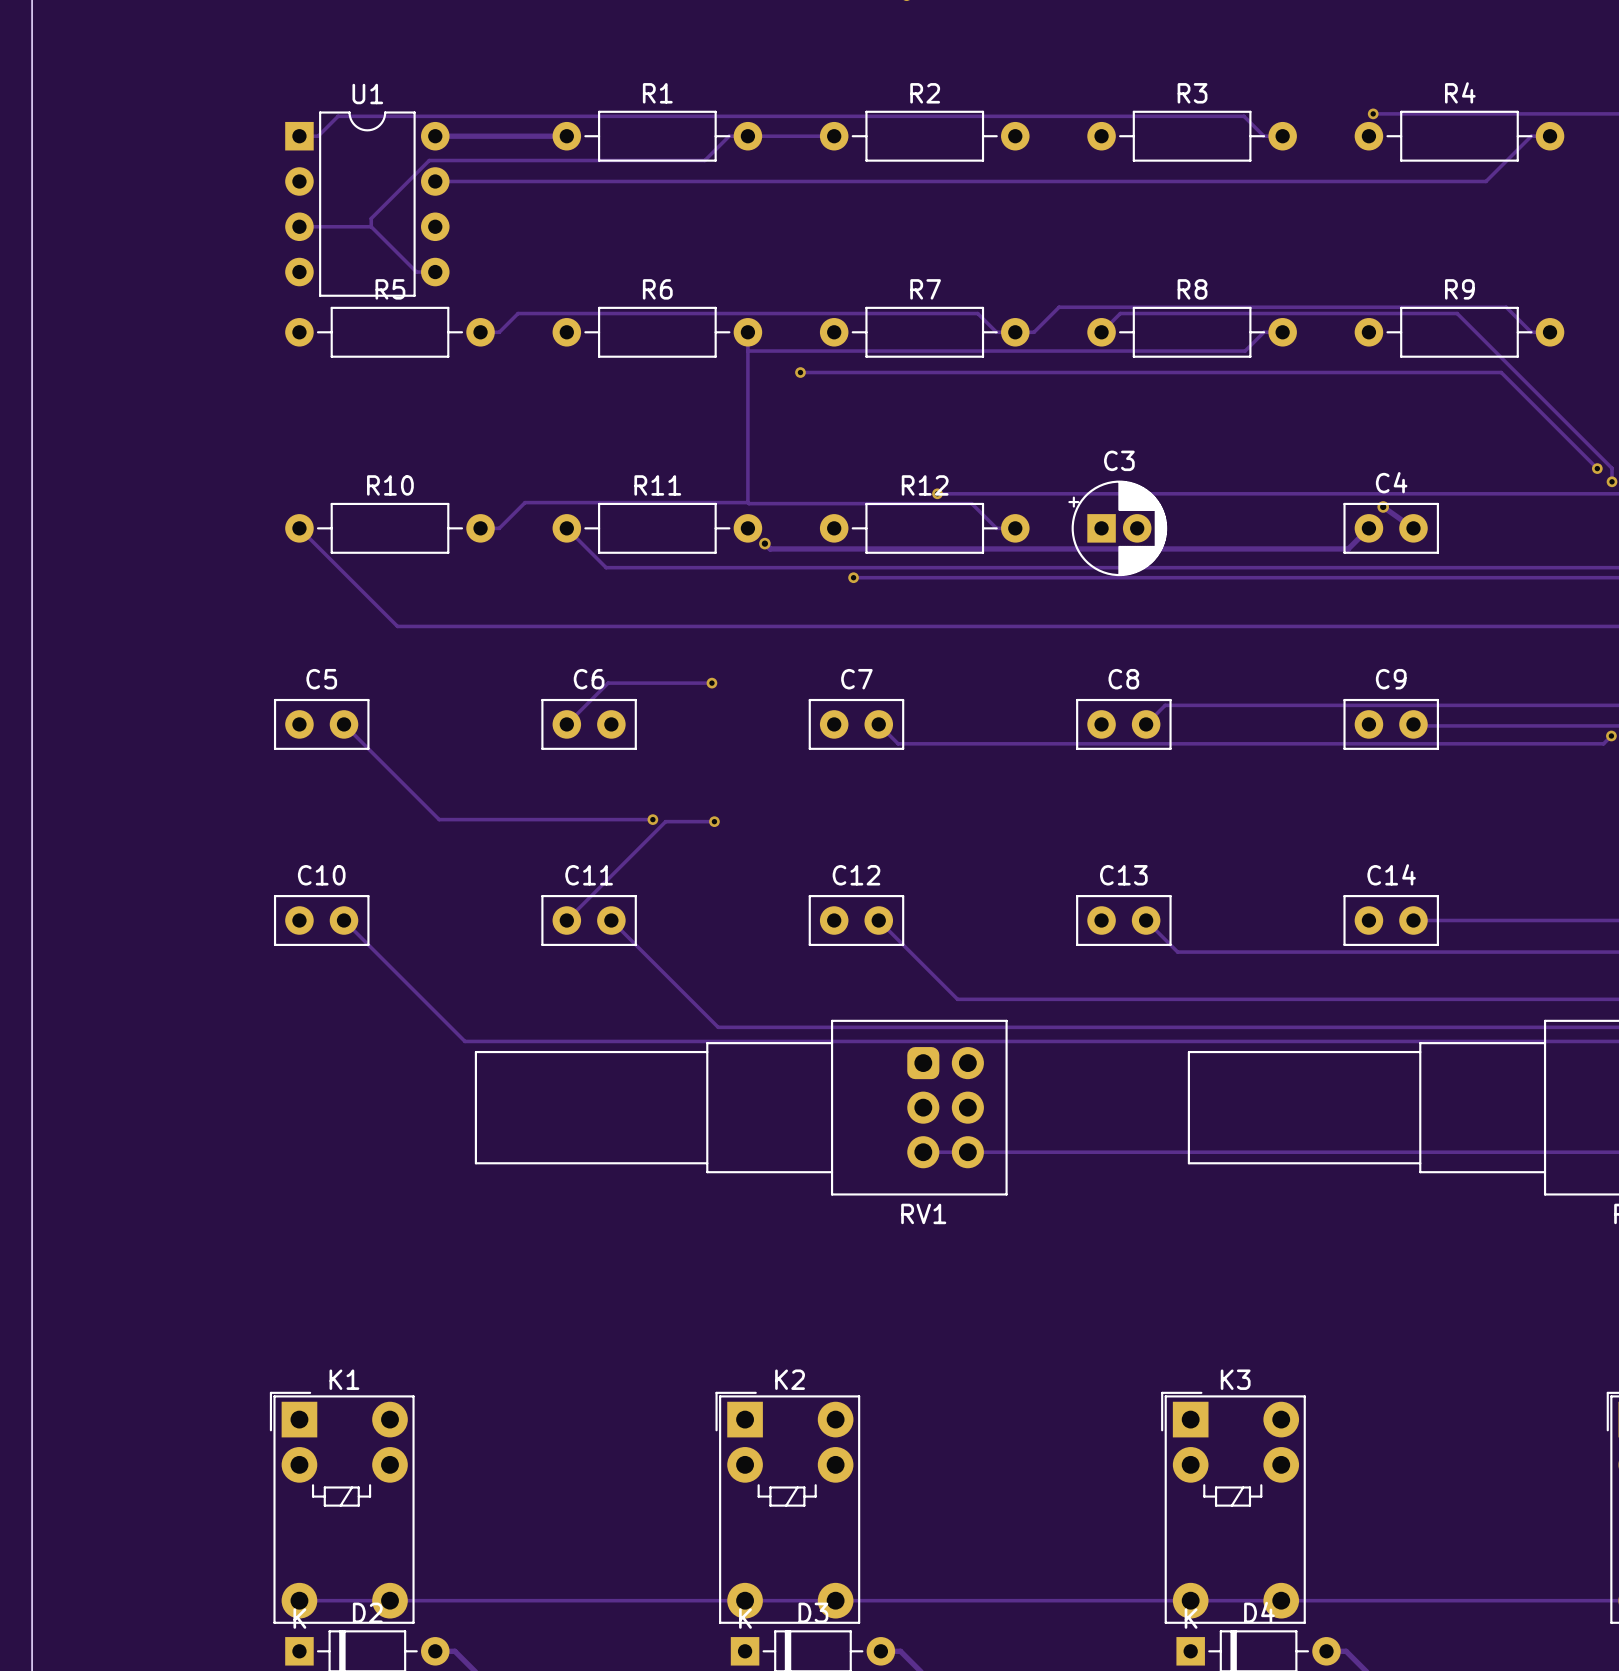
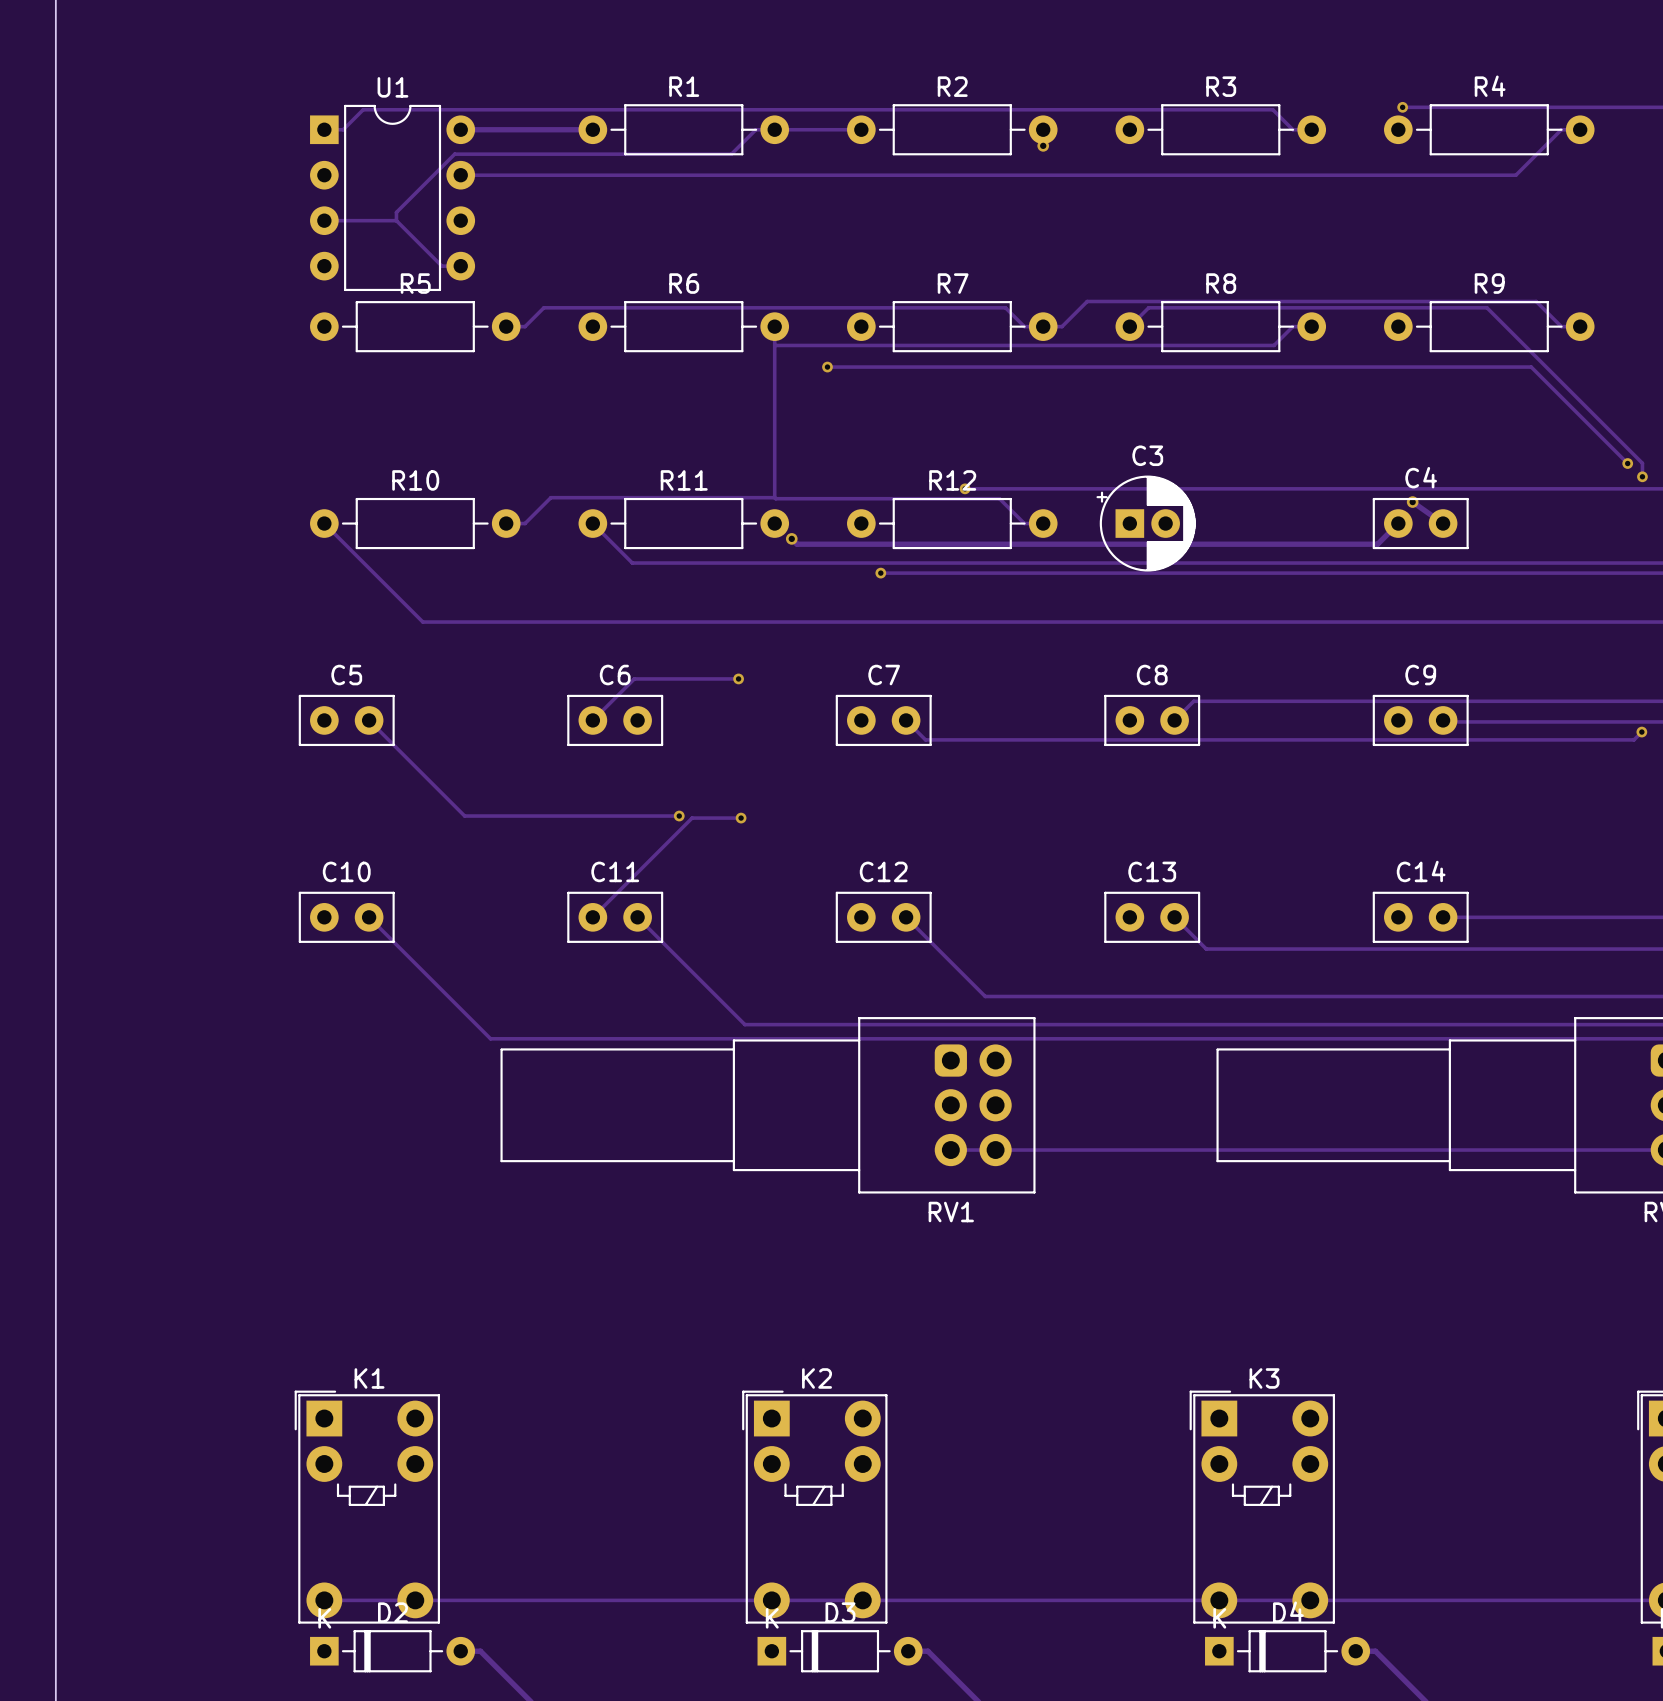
via: none -> (1043, 145)

